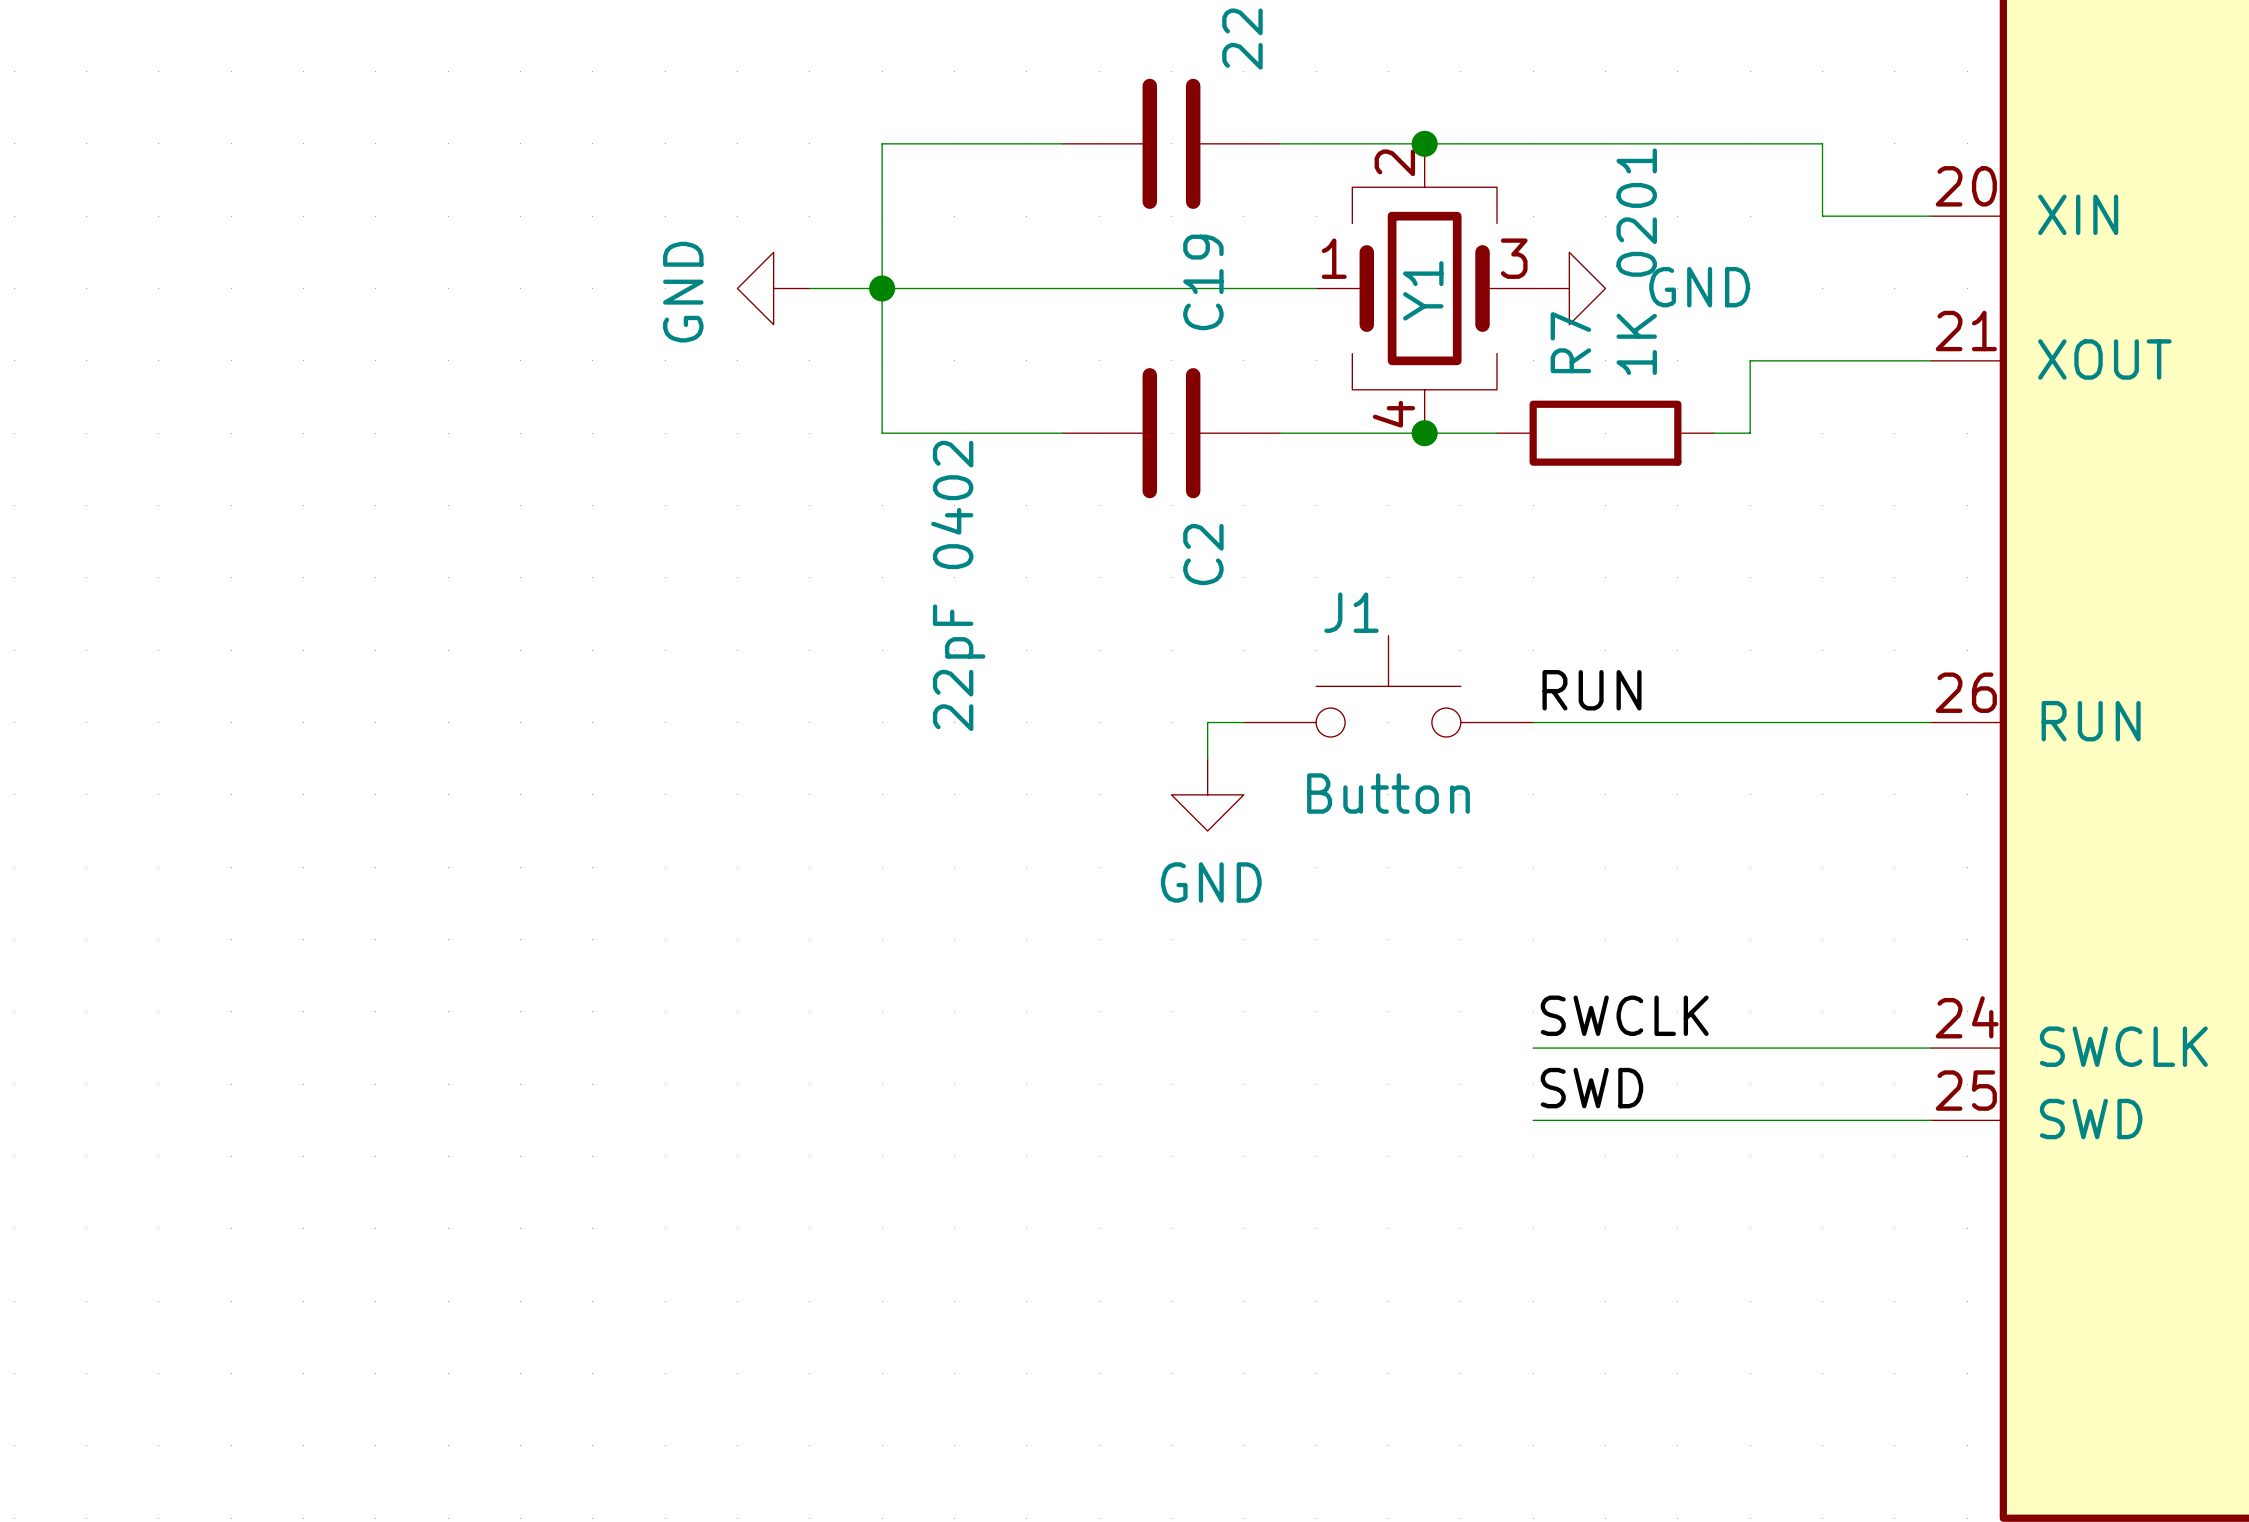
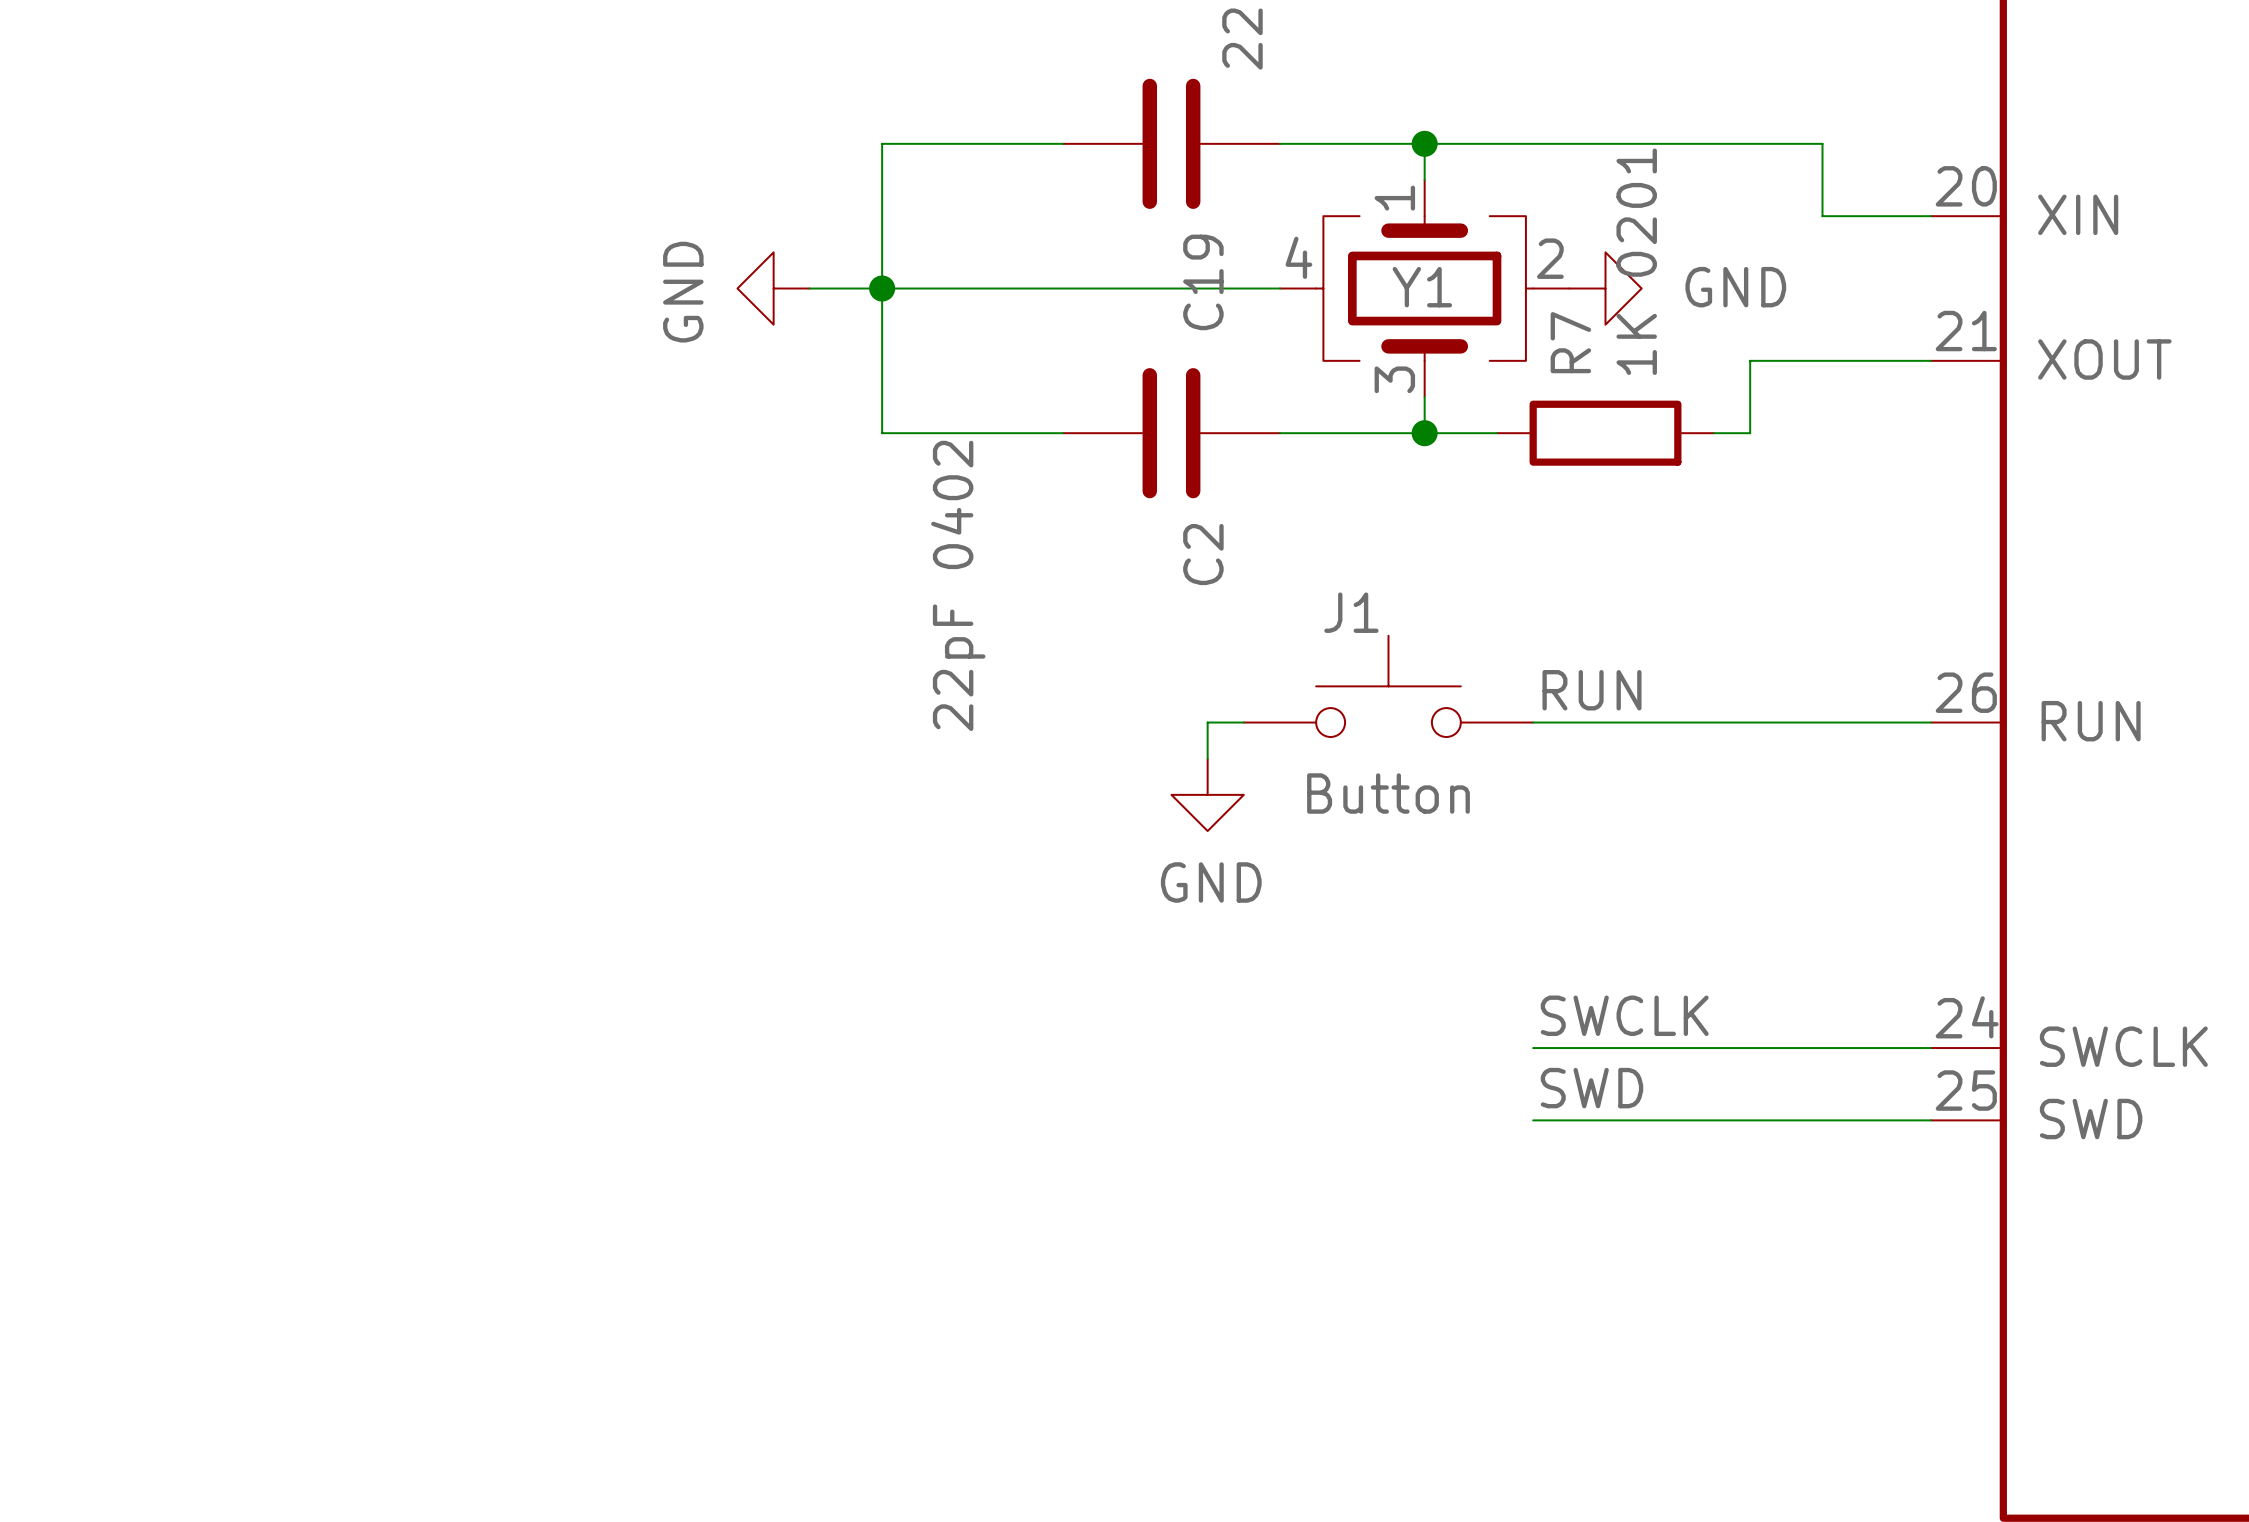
Y1 rotation: 0° (1424, 288) -> 90° clockwise (1424, 288)
power symbol position: GND (1569, 288) -> GND (1605, 288)

